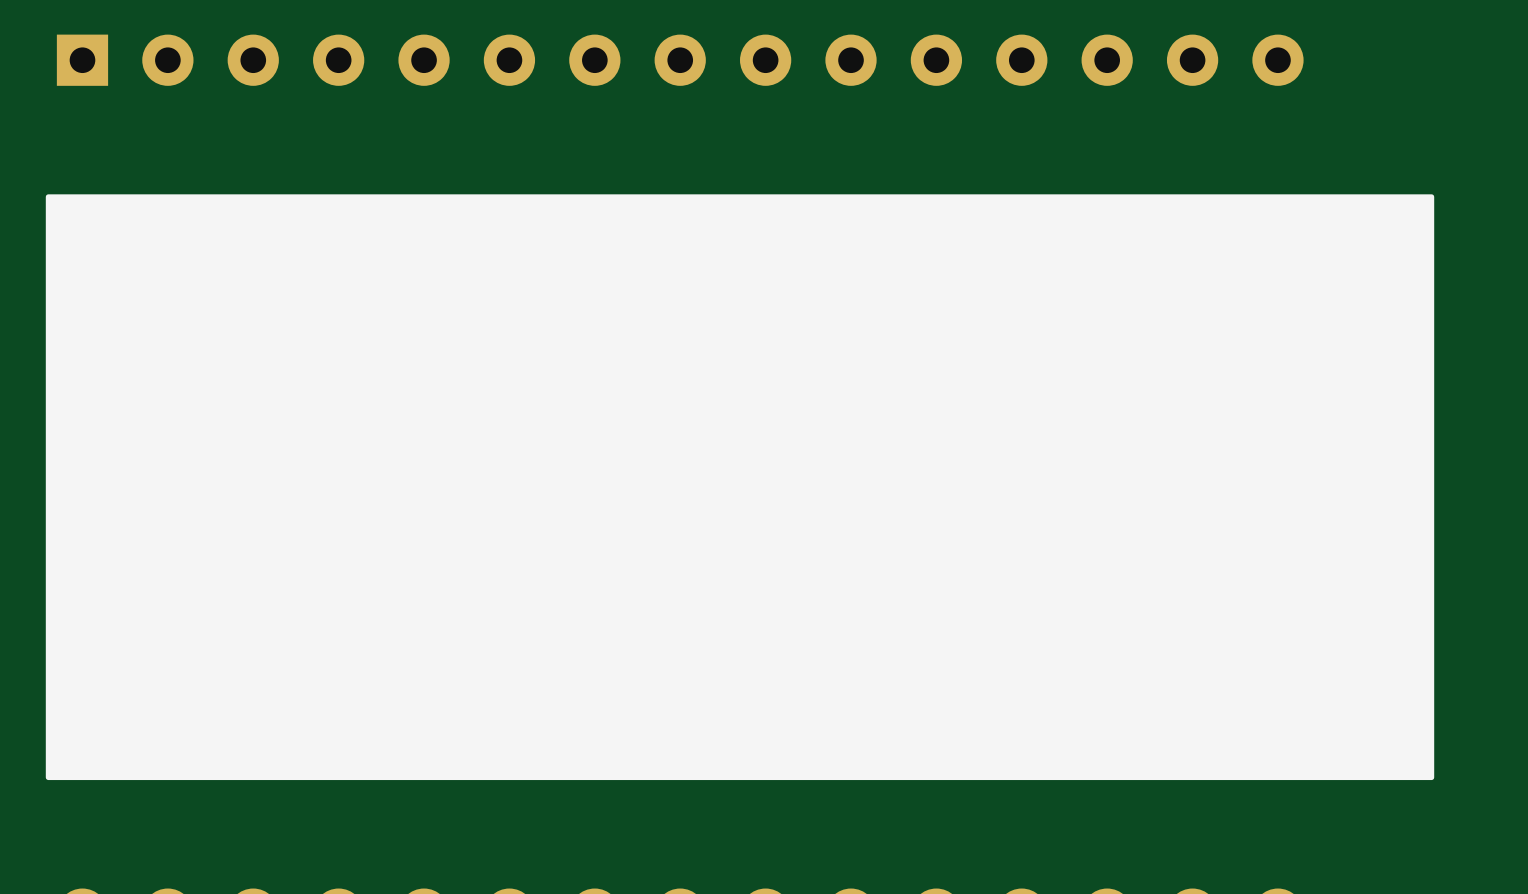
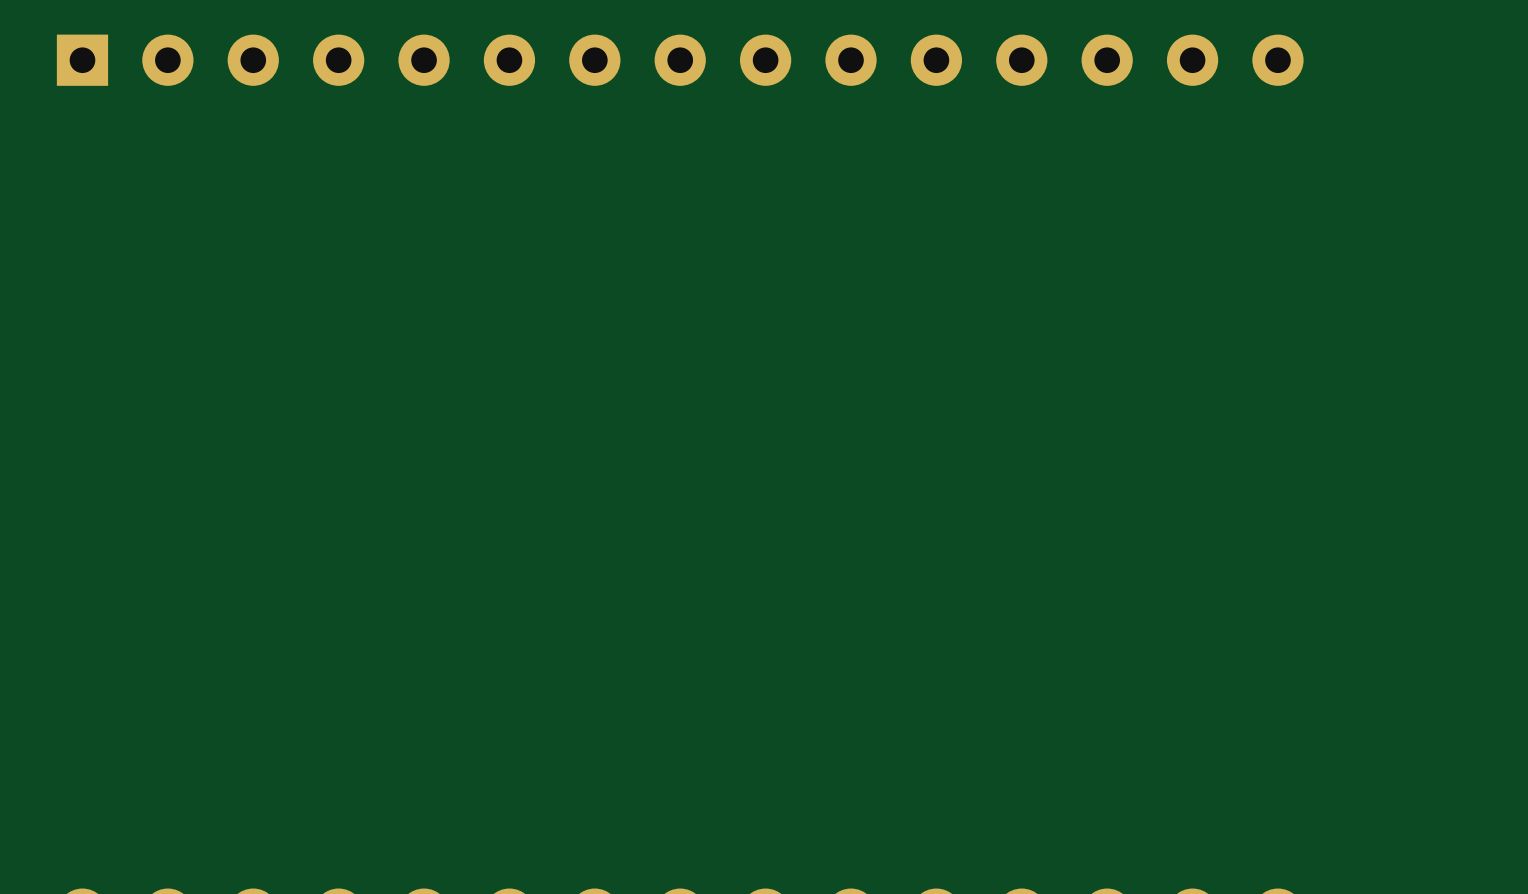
drawing: [45, 194, 1435, 781] -> none

